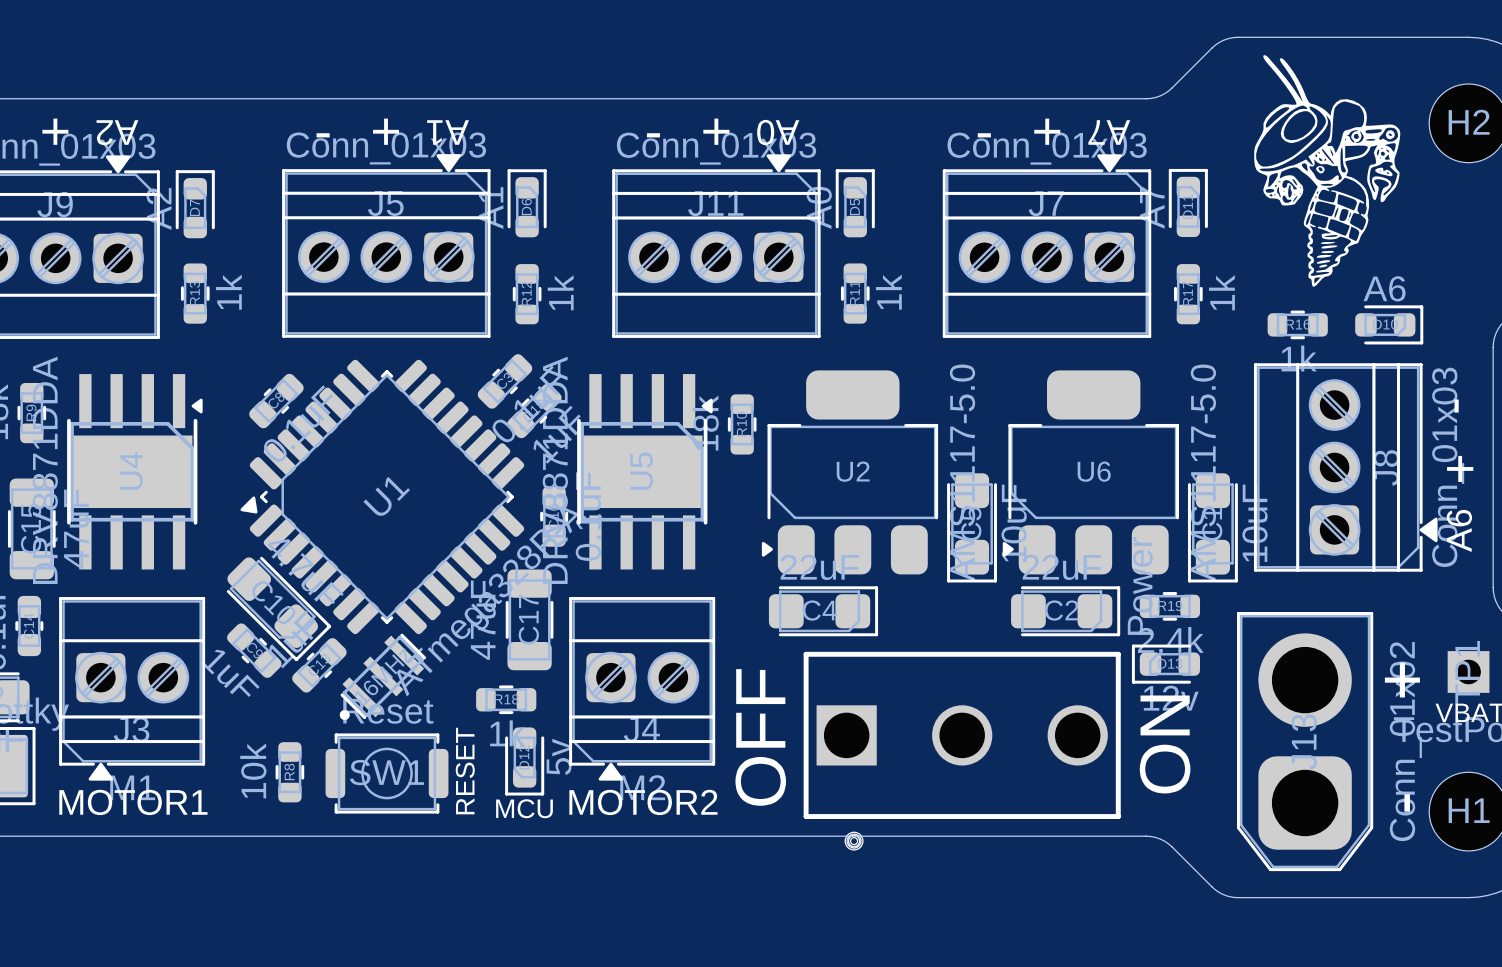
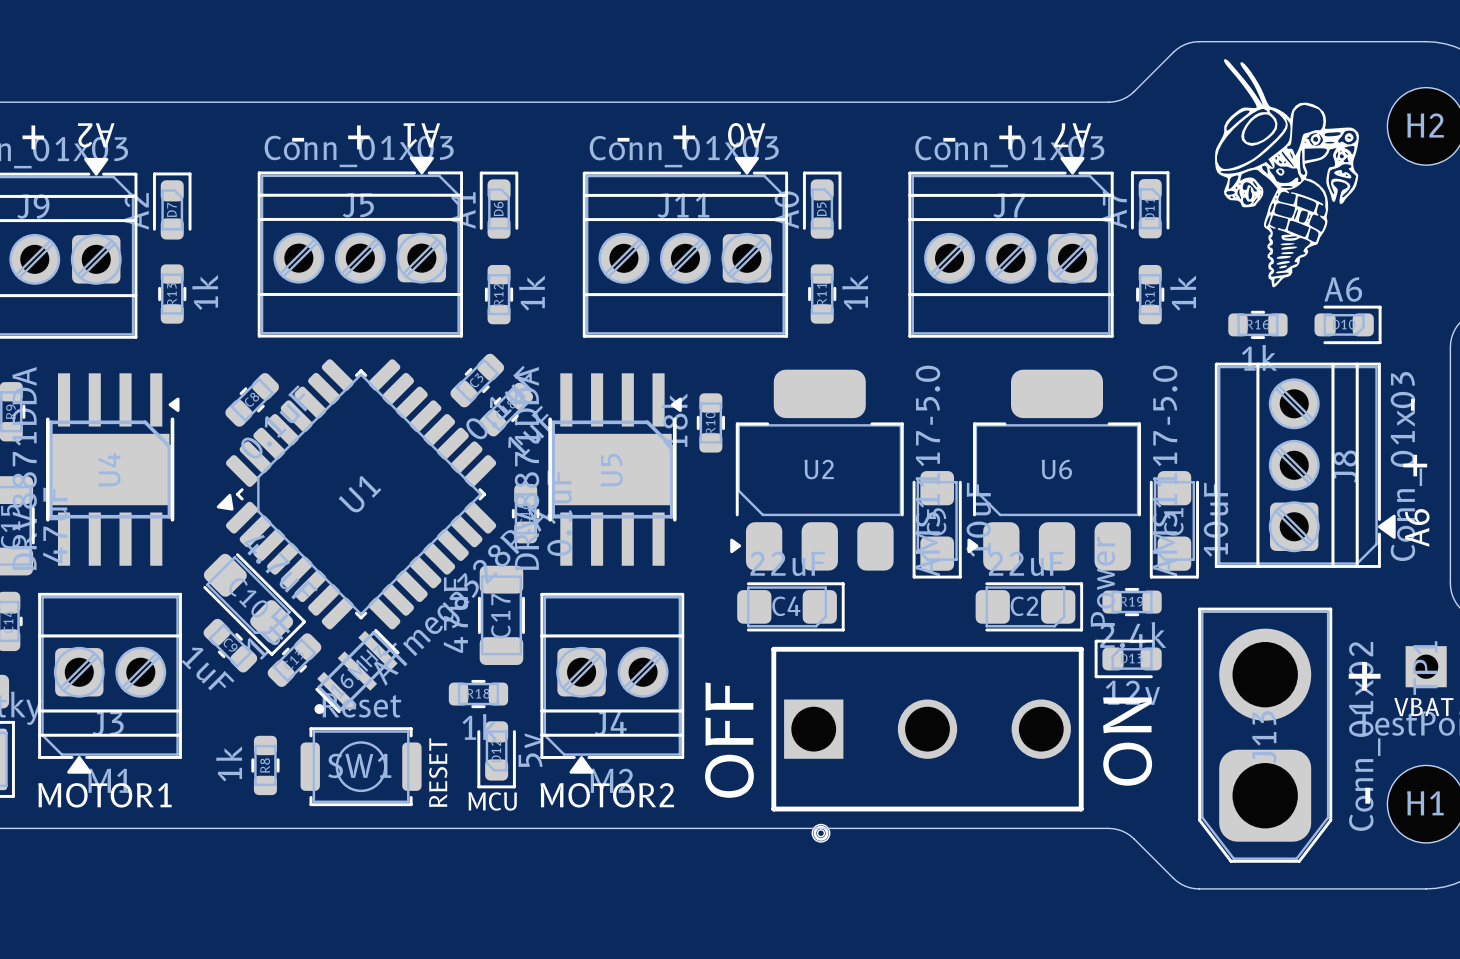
R8 value: 10k (253, 770) -> 1k (229, 763)

